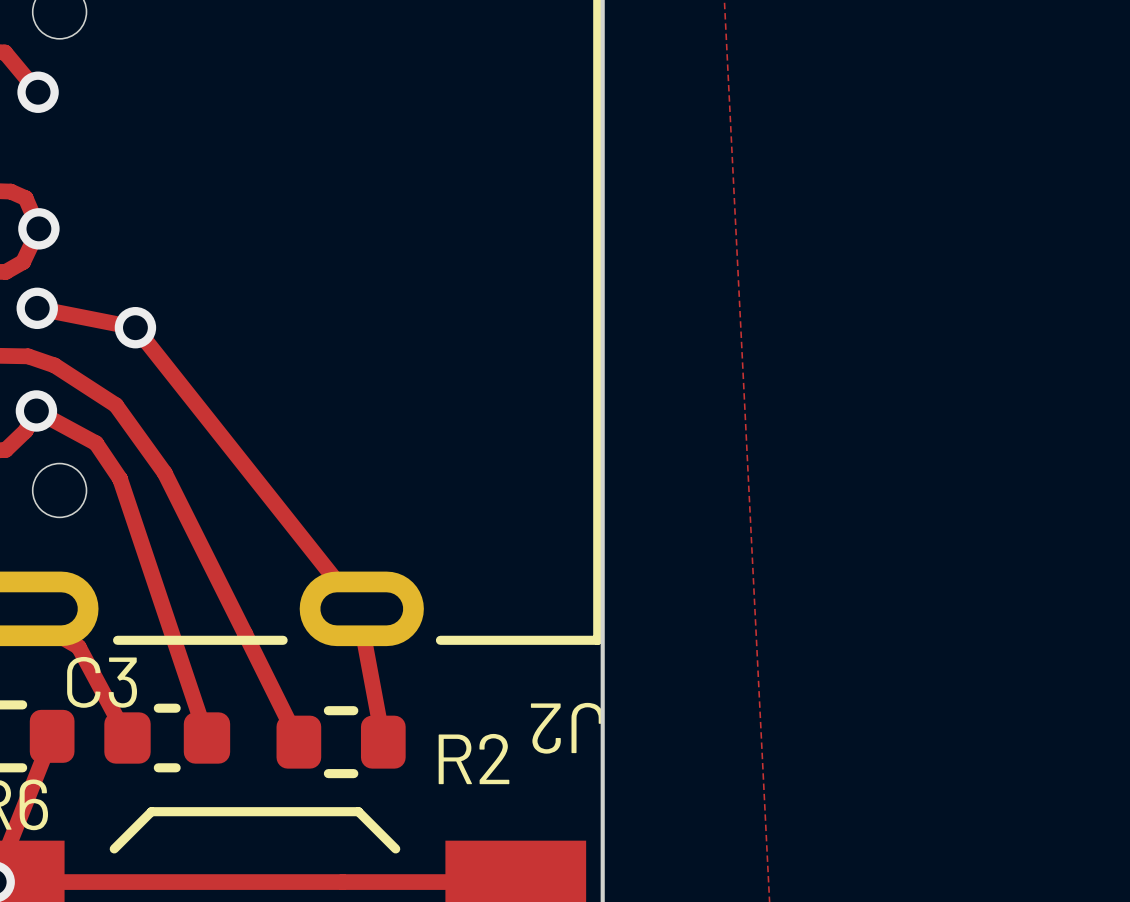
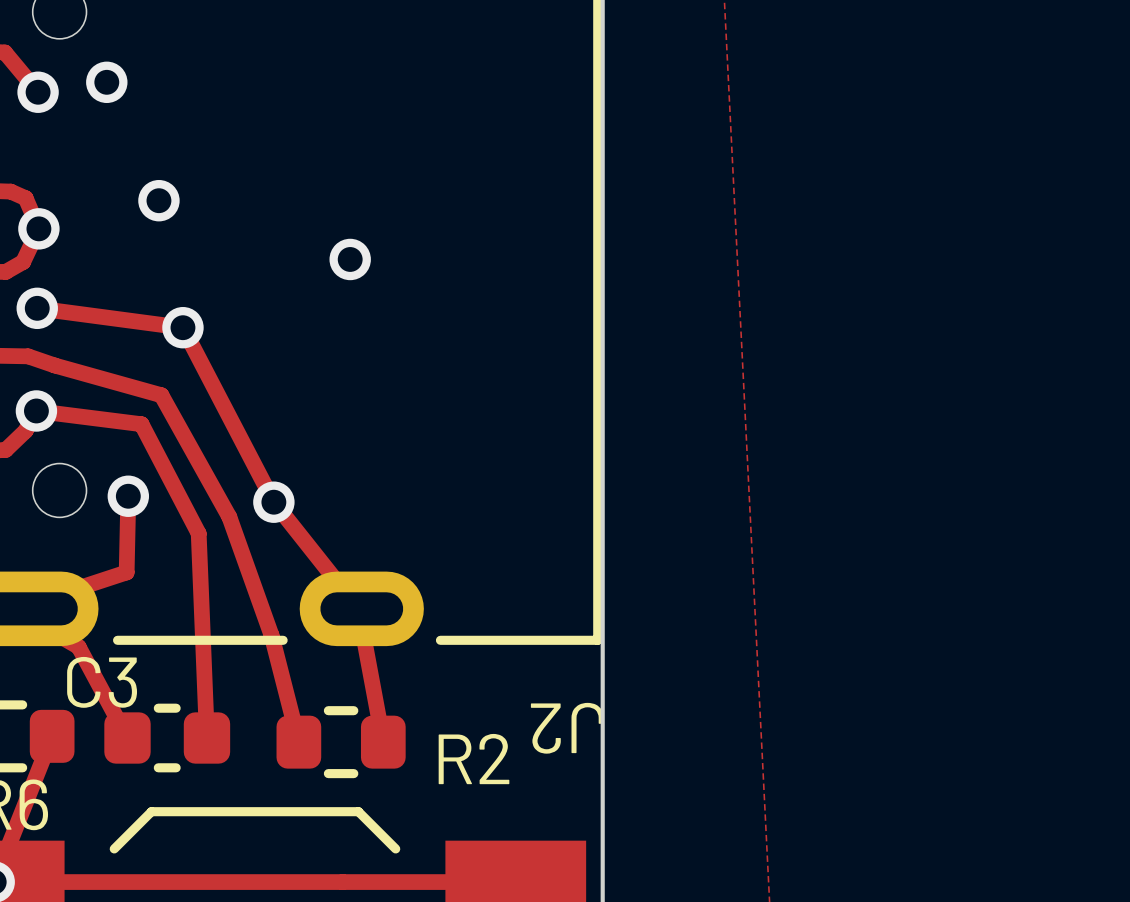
via: none -> (106, 82)
via: none -> (158, 200)
via: none -> (350, 259)
track: (37, 308) (135, 327) (273, 502) -> (37, 308) (182, 327) (273, 502)
via position: (135, 327) -> (182, 327)
track: (54, 365) (115, 405) (164, 473) (298, 742) -> (54, 365) (161, 395) (229, 516) (271, 635) (298, 742)
track: (36, 410) (96, 443) (120, 478) (206, 738) -> (36, 410) (141, 424) (198, 533) (206, 738)
track: none -> (128, 496) (126, 572) (15, 608)
via: none -> (128, 496)
via: none -> (273, 502)

